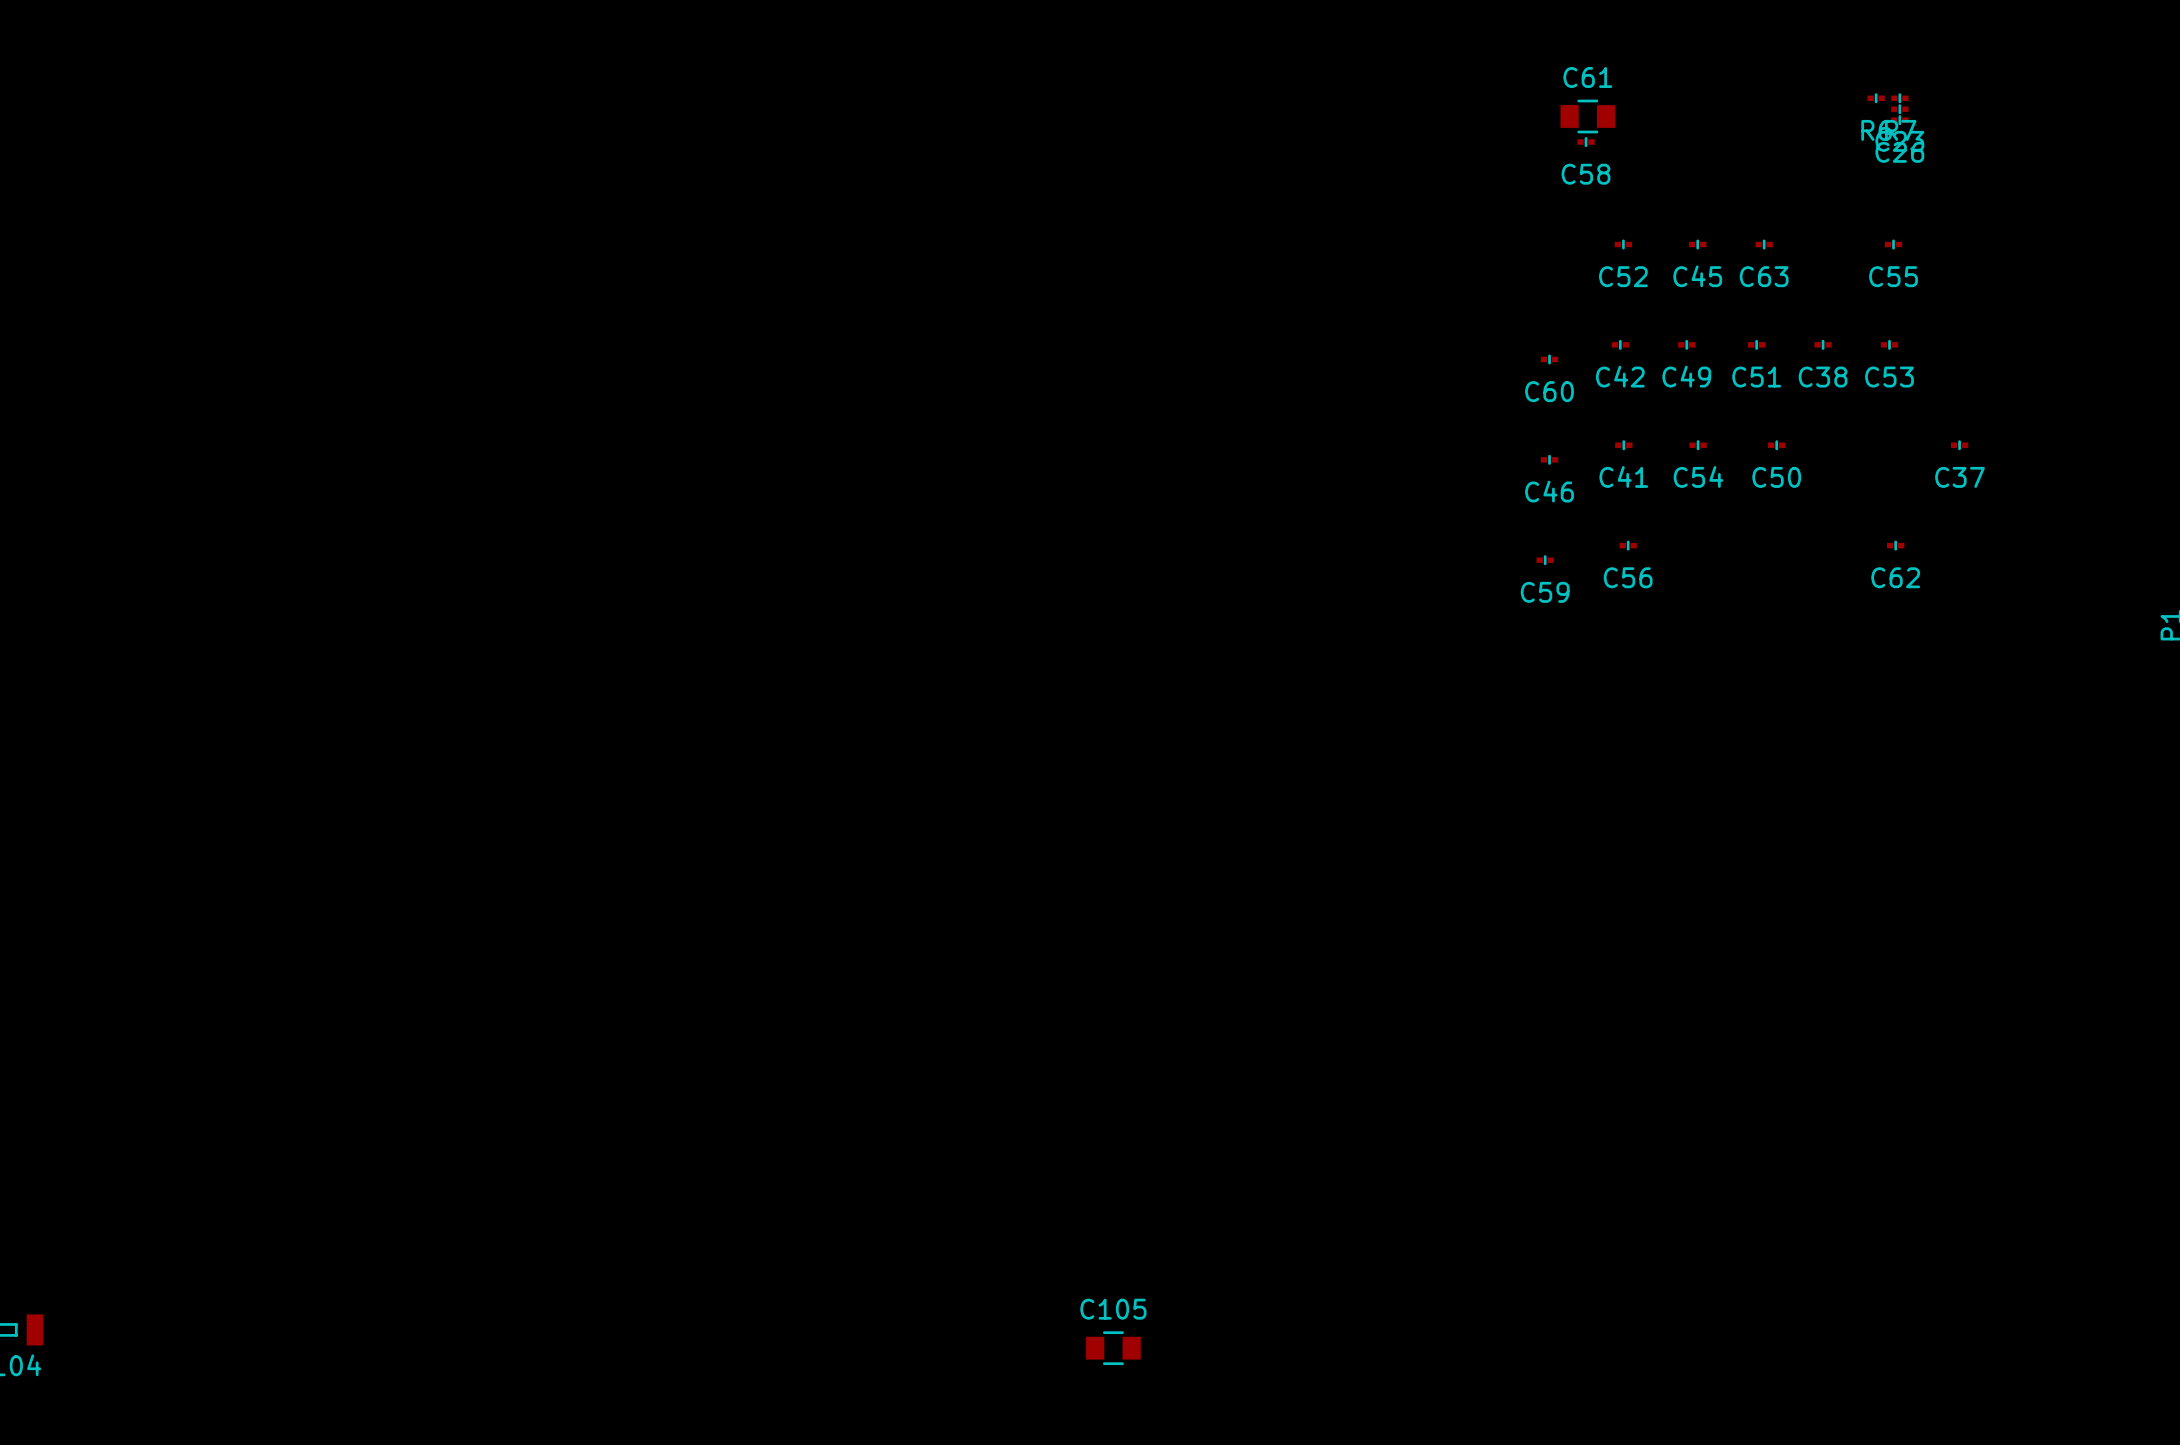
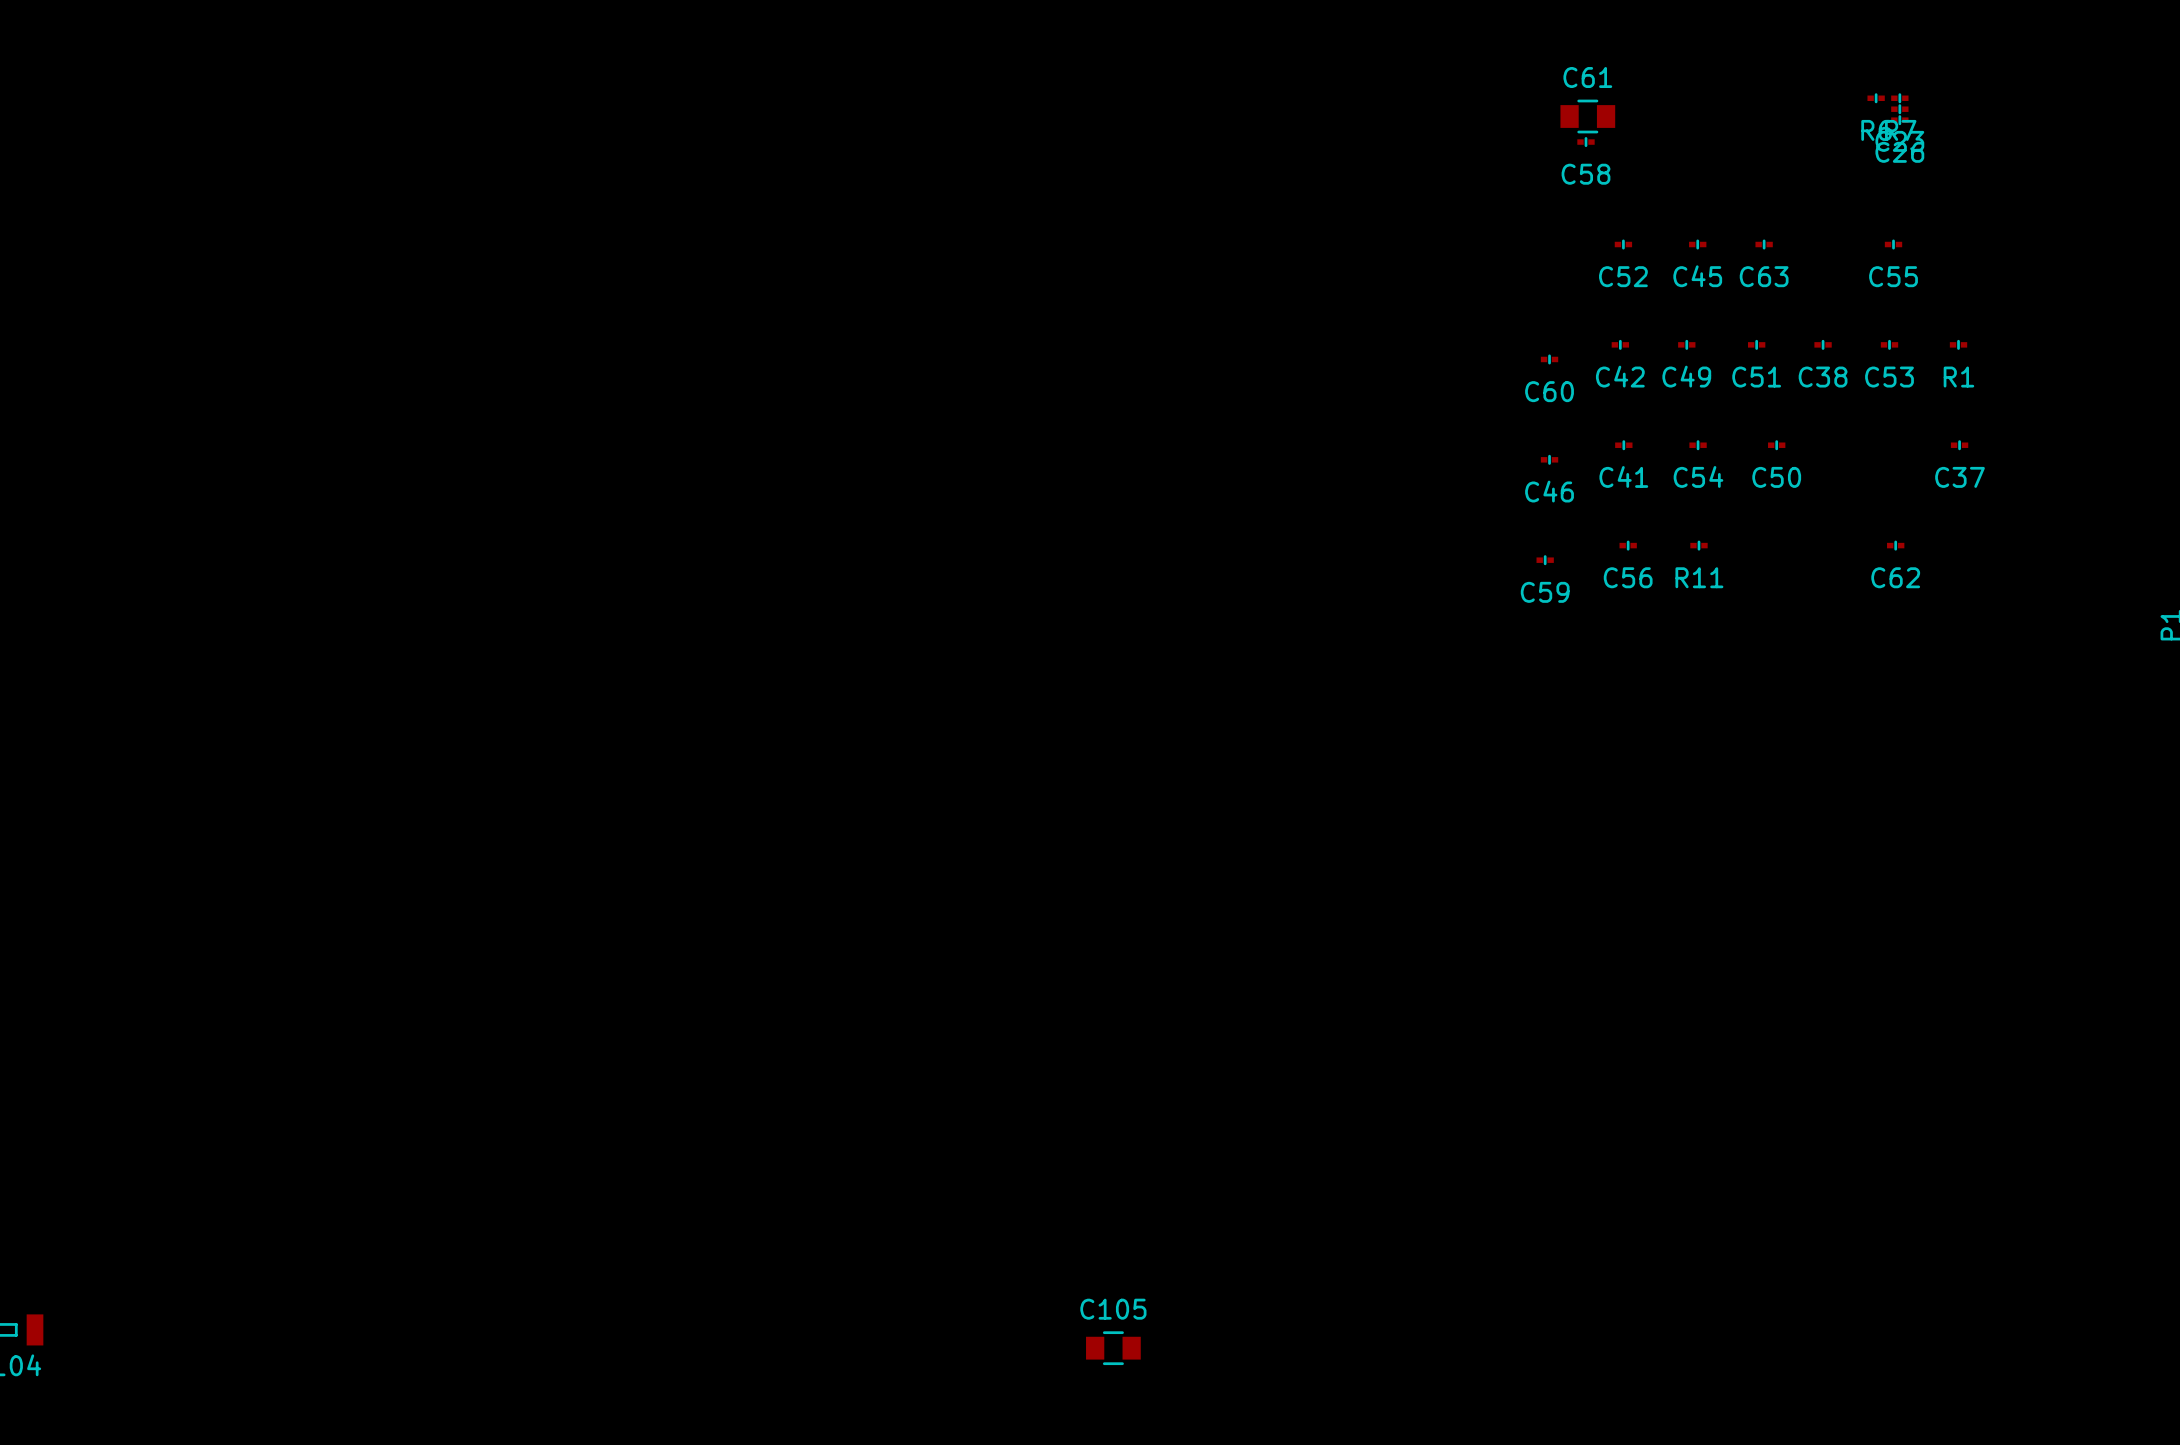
R1: none -> (1958, 344)
R11: none -> (1698, 545)

